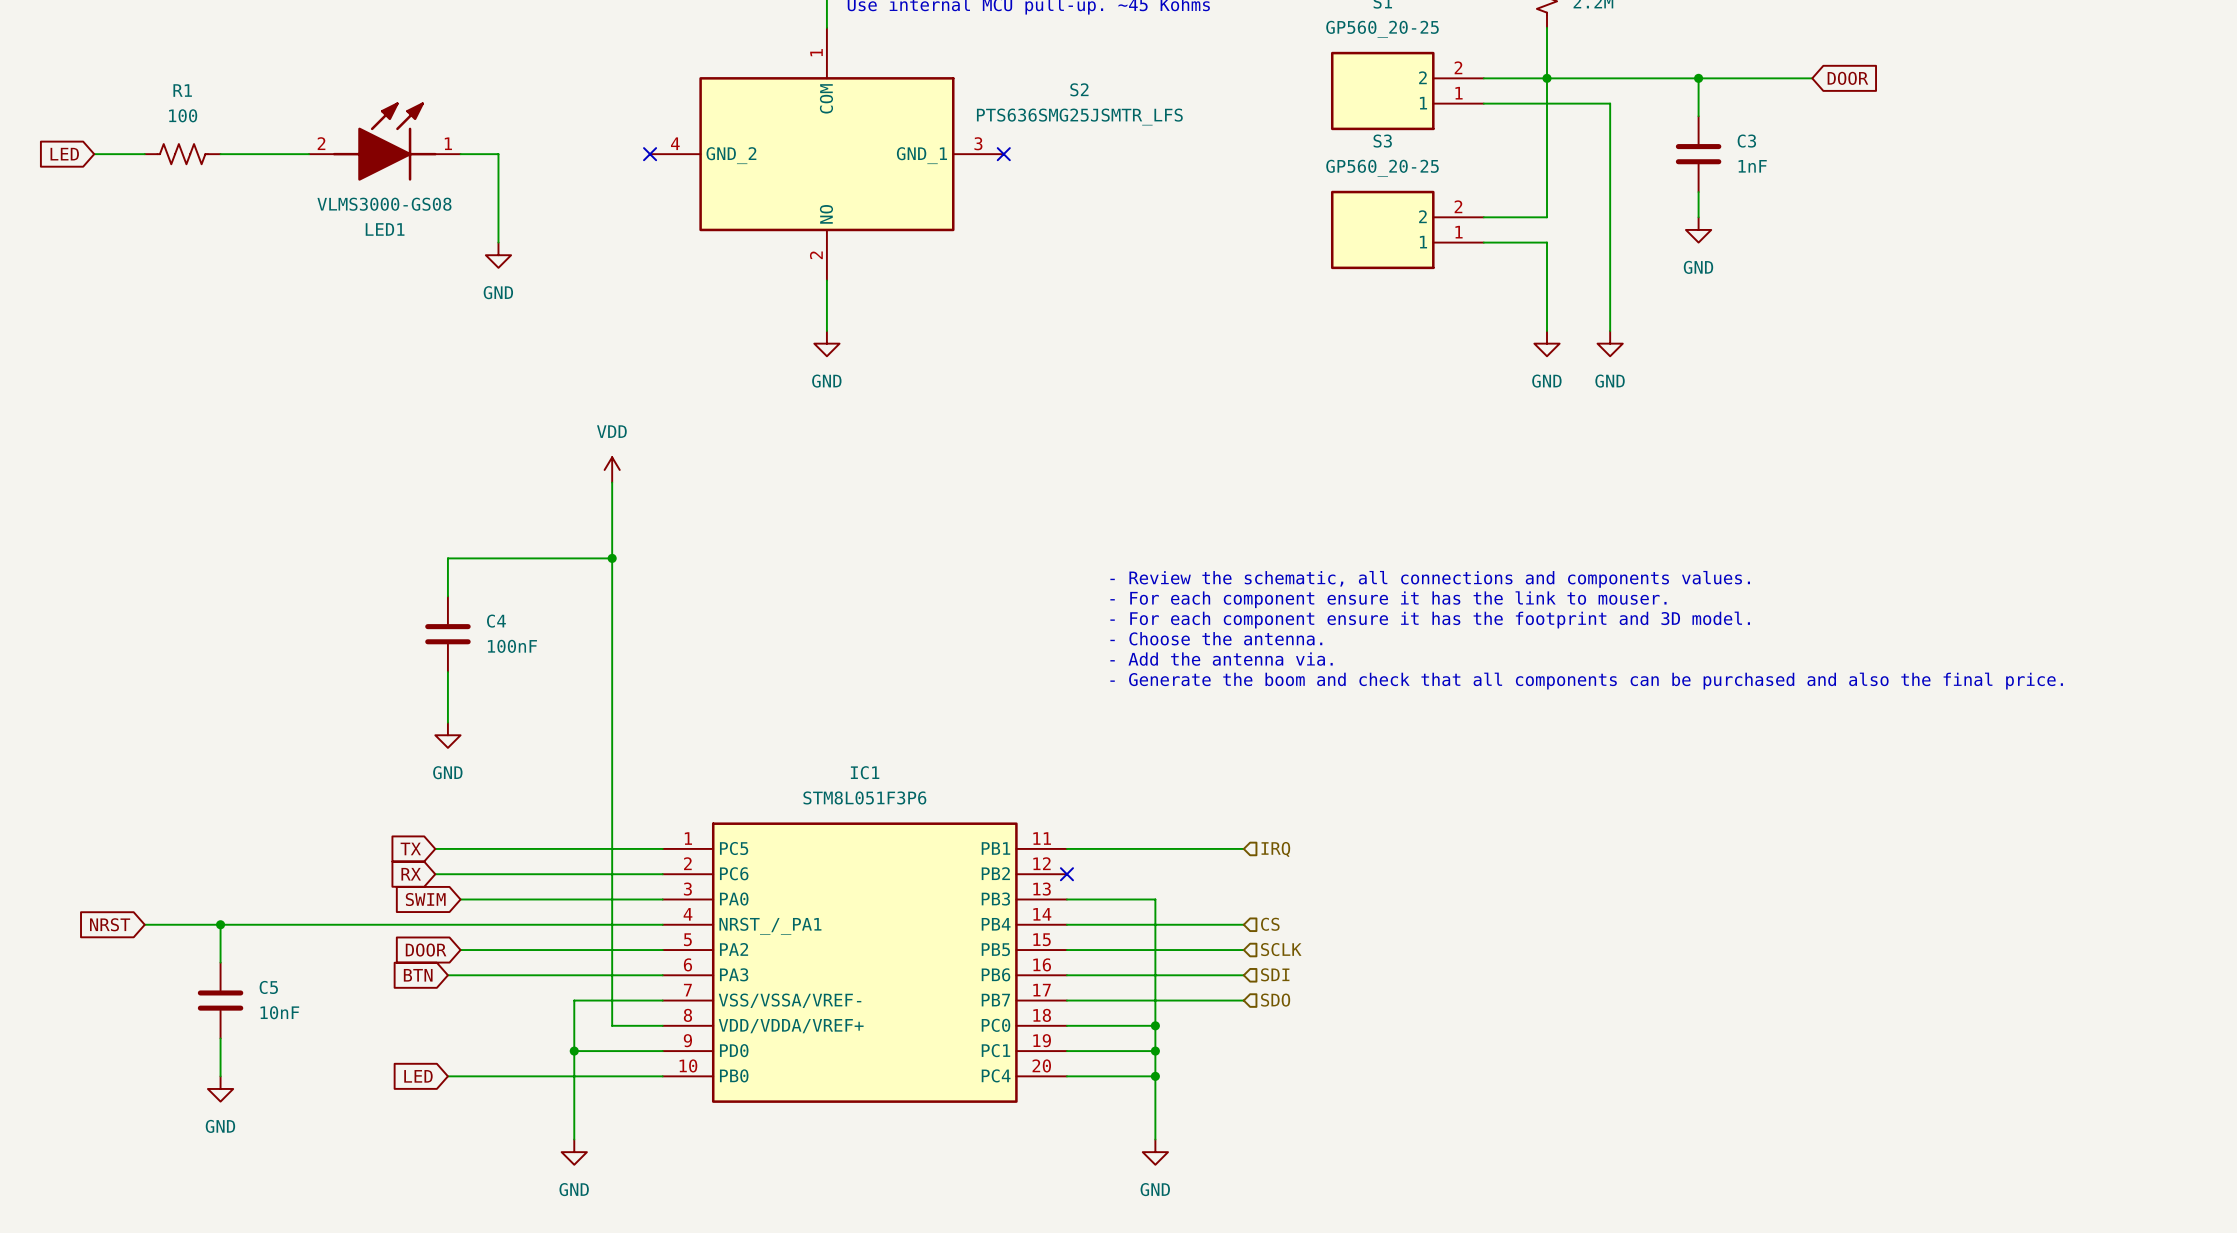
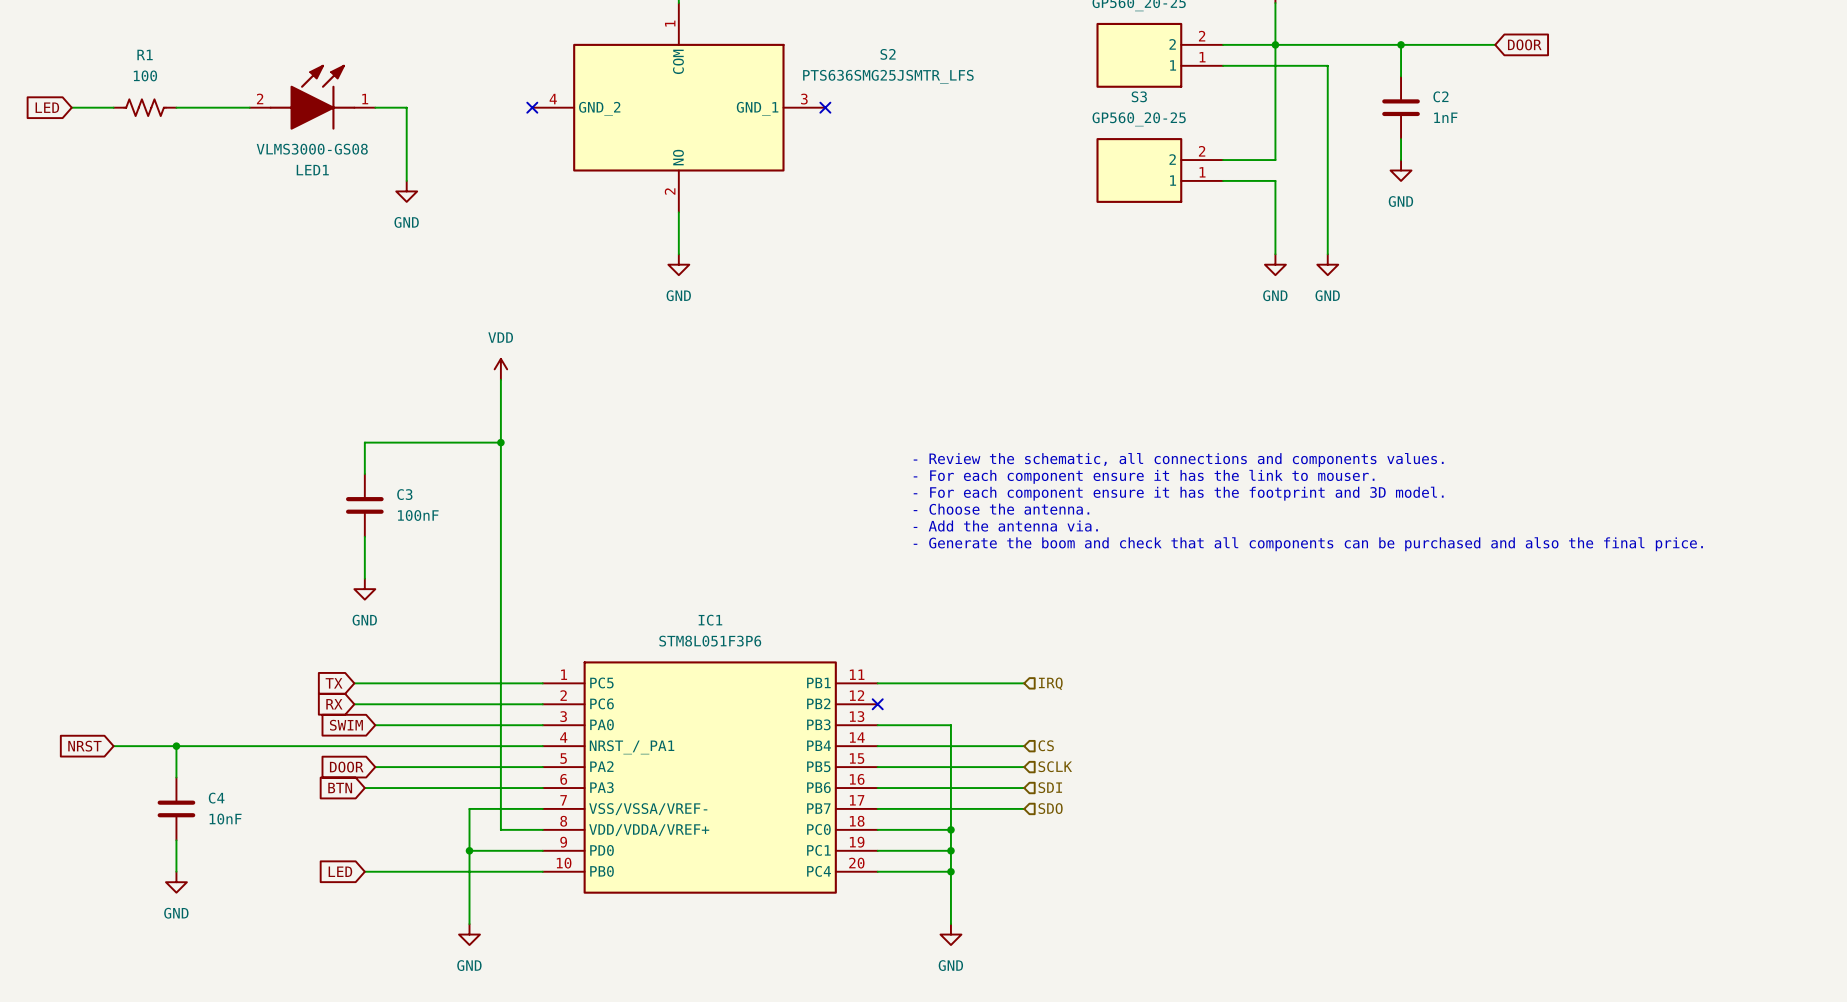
C3 name: C3 (1746, 141) -> C2 (1440, 96)
C4 name: C4 (496, 621) -> C3 (404, 494)
C5 name: C5 (268, 987) -> C4 (216, 798)

